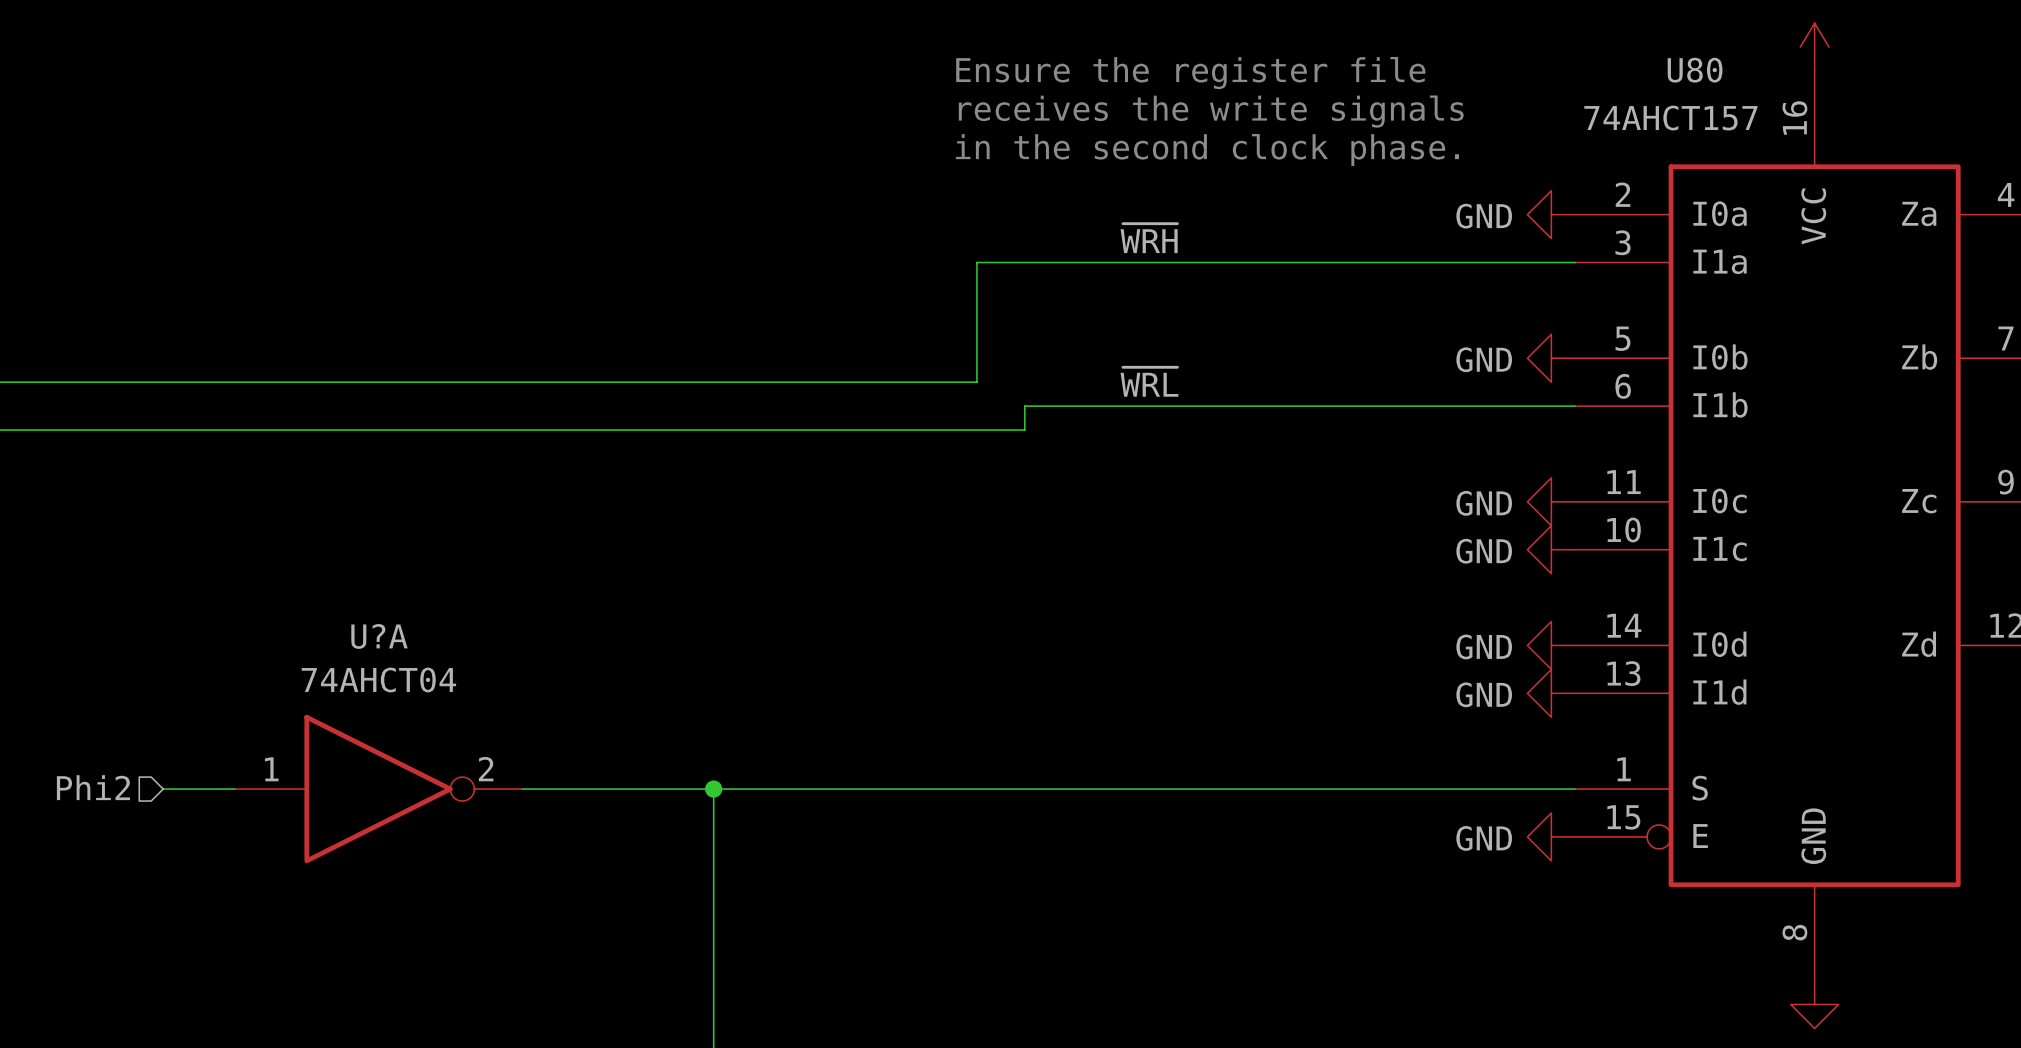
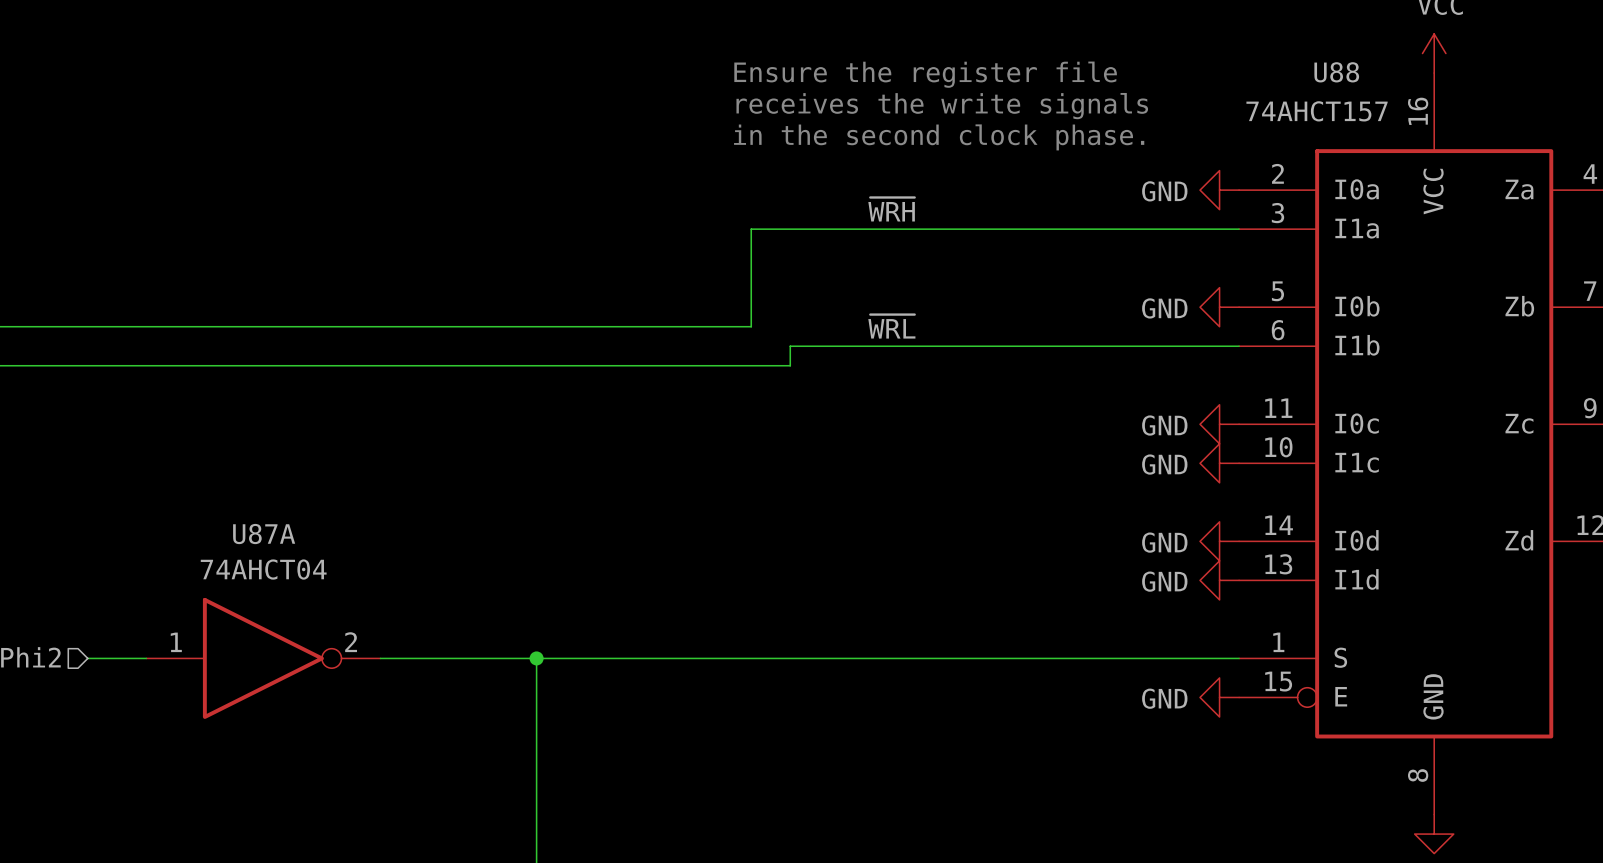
U80 name: U80 (1695, 70) -> U88 (1336, 72)
U?A name: U?A (379, 636) -> U87A (264, 534)

